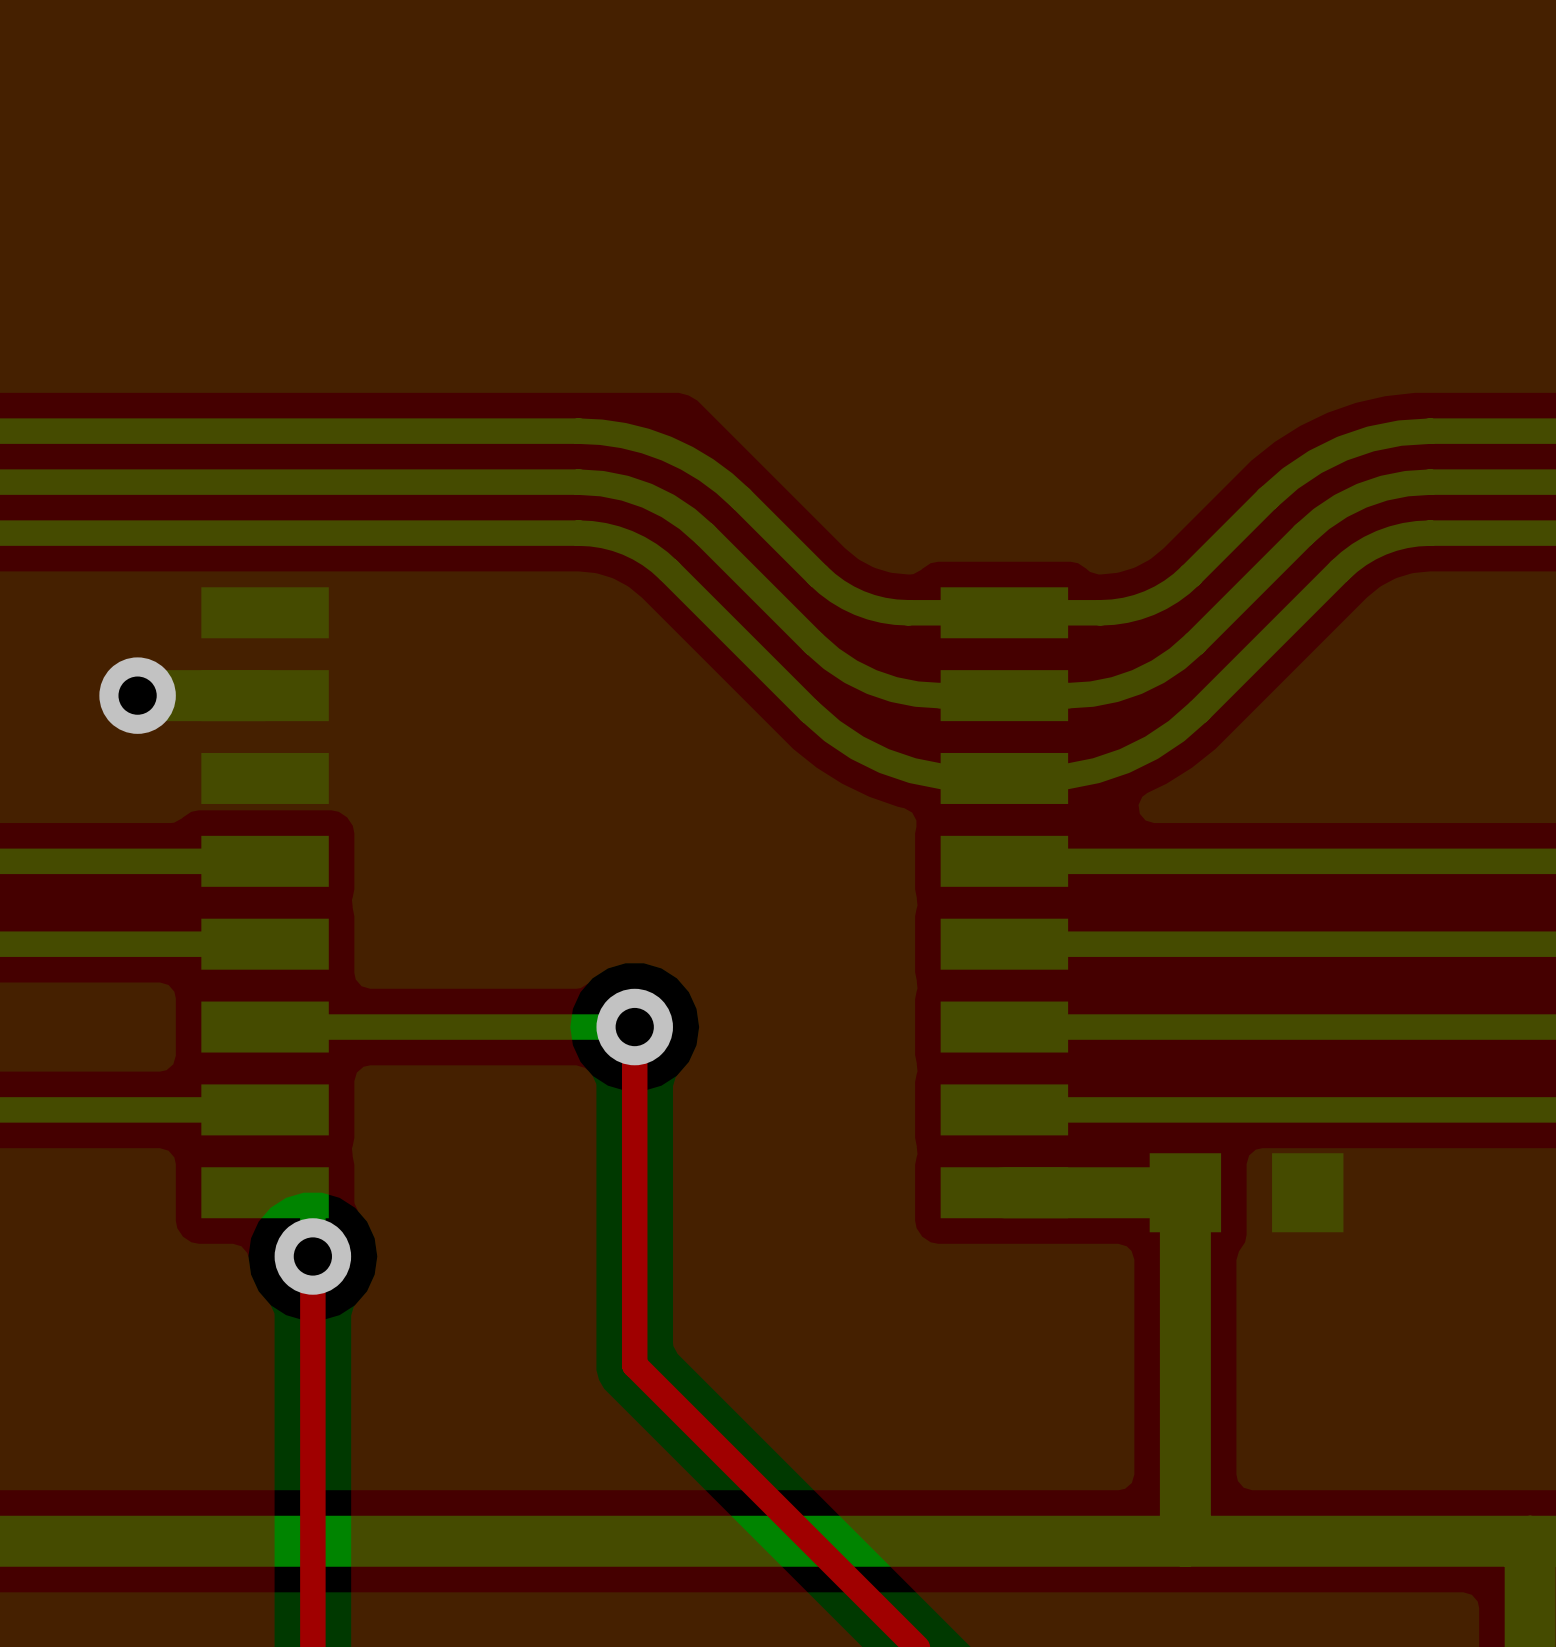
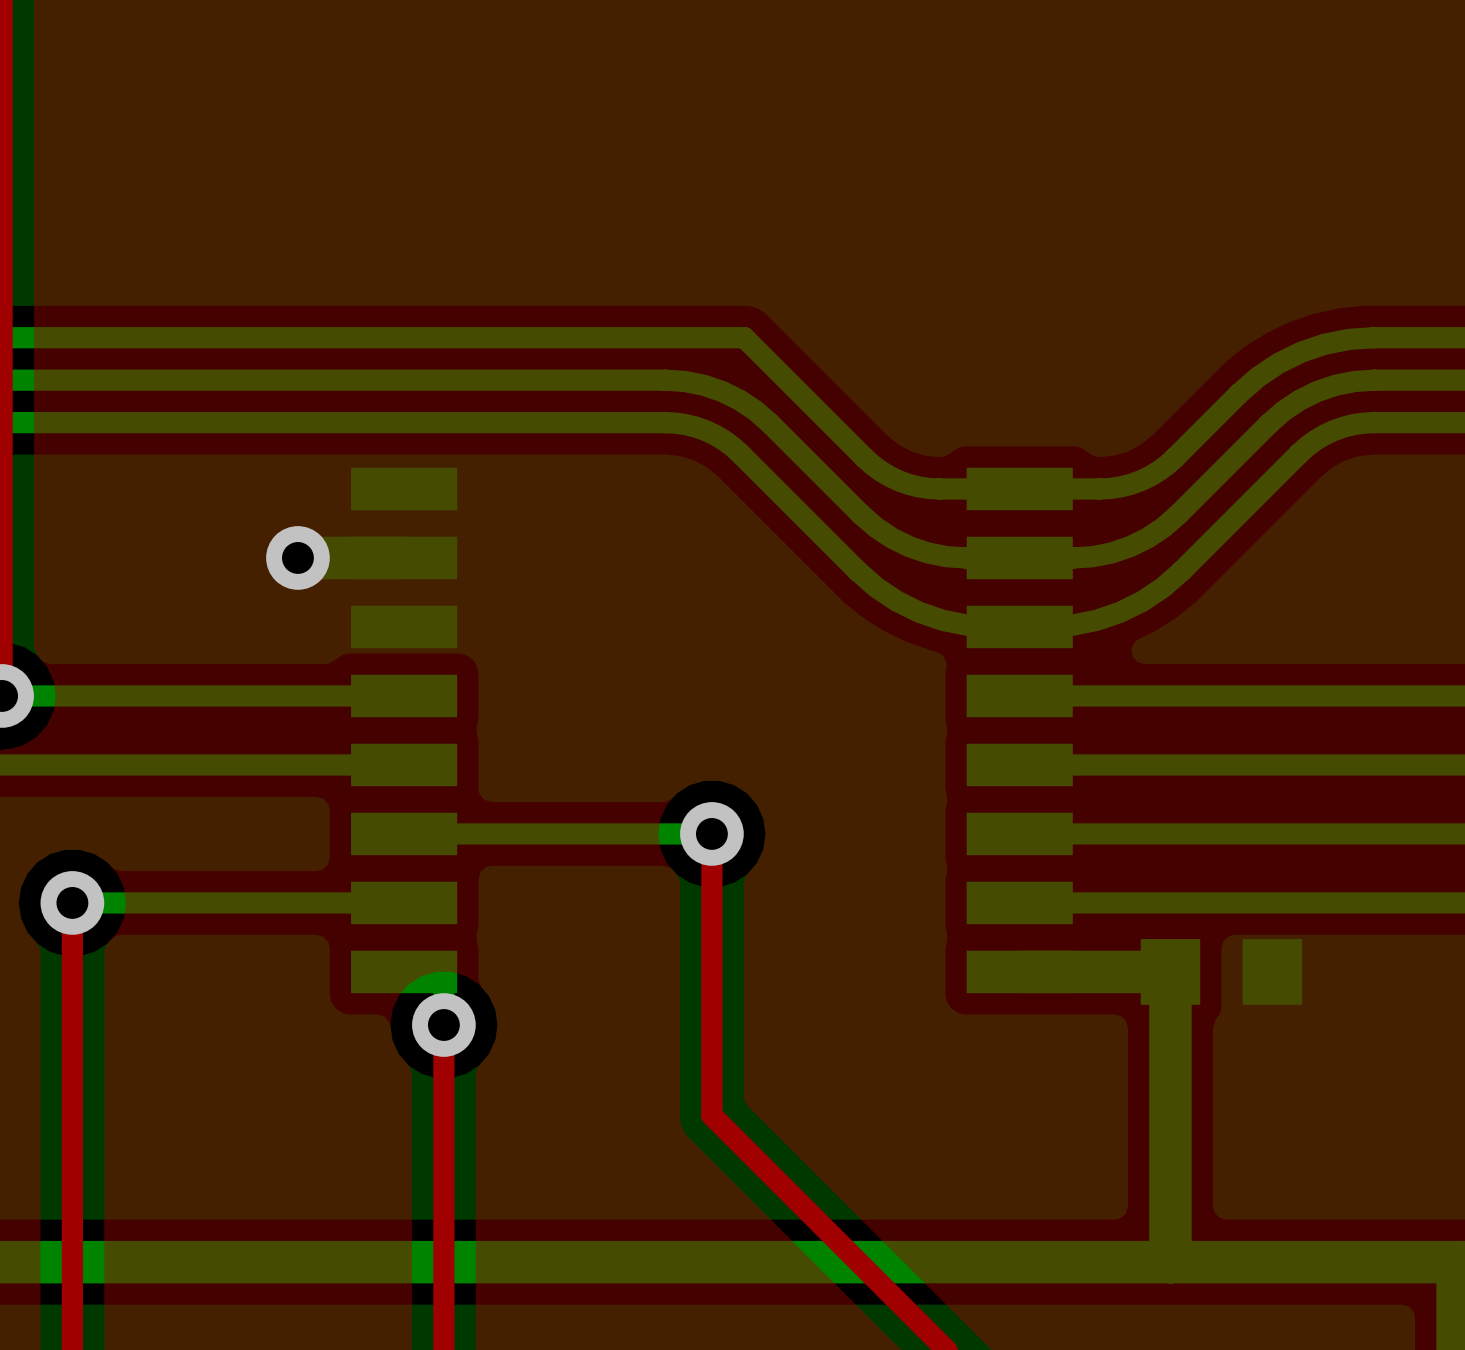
bottom track: (578, 431) (623, 435) (666, 448) (706, 469) (740, 498) -> (665, 337) (744, 337) (800, 393)

